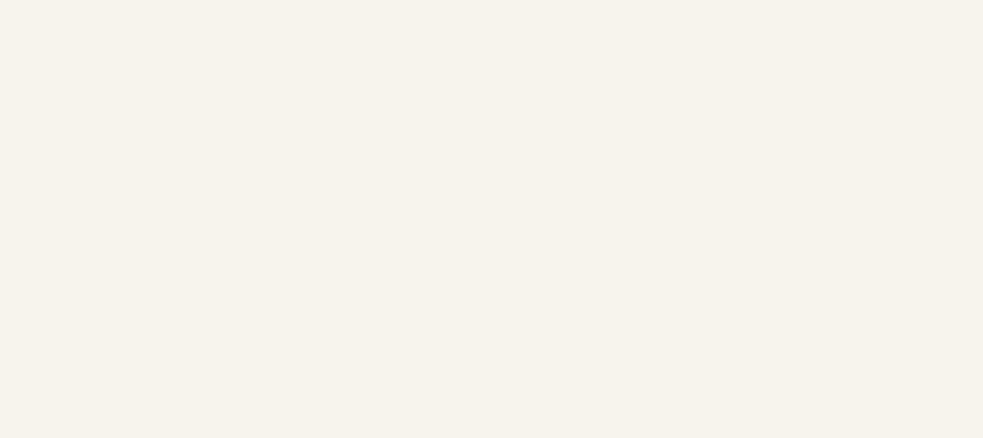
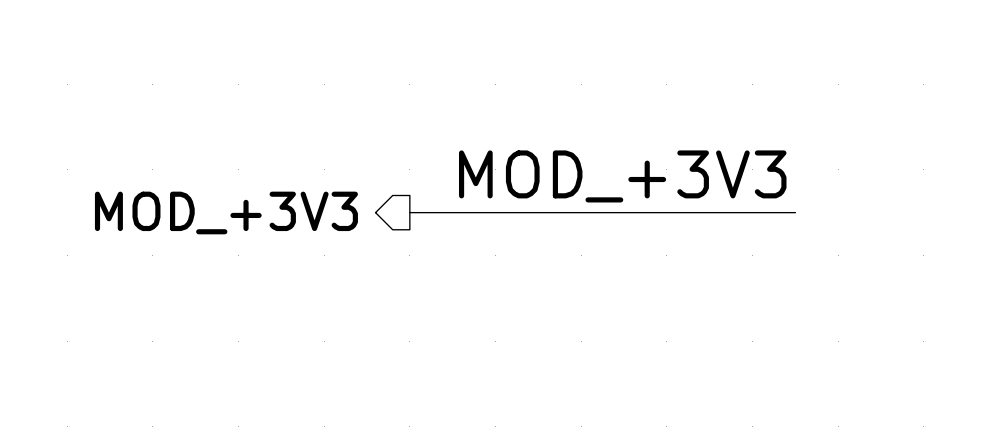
label: none -> MOD_+3V3 (622, 176)
hierarchical label: none -> MOD_+3V3 (226, 212)
wire: none -> (409, 212) (795, 212)

